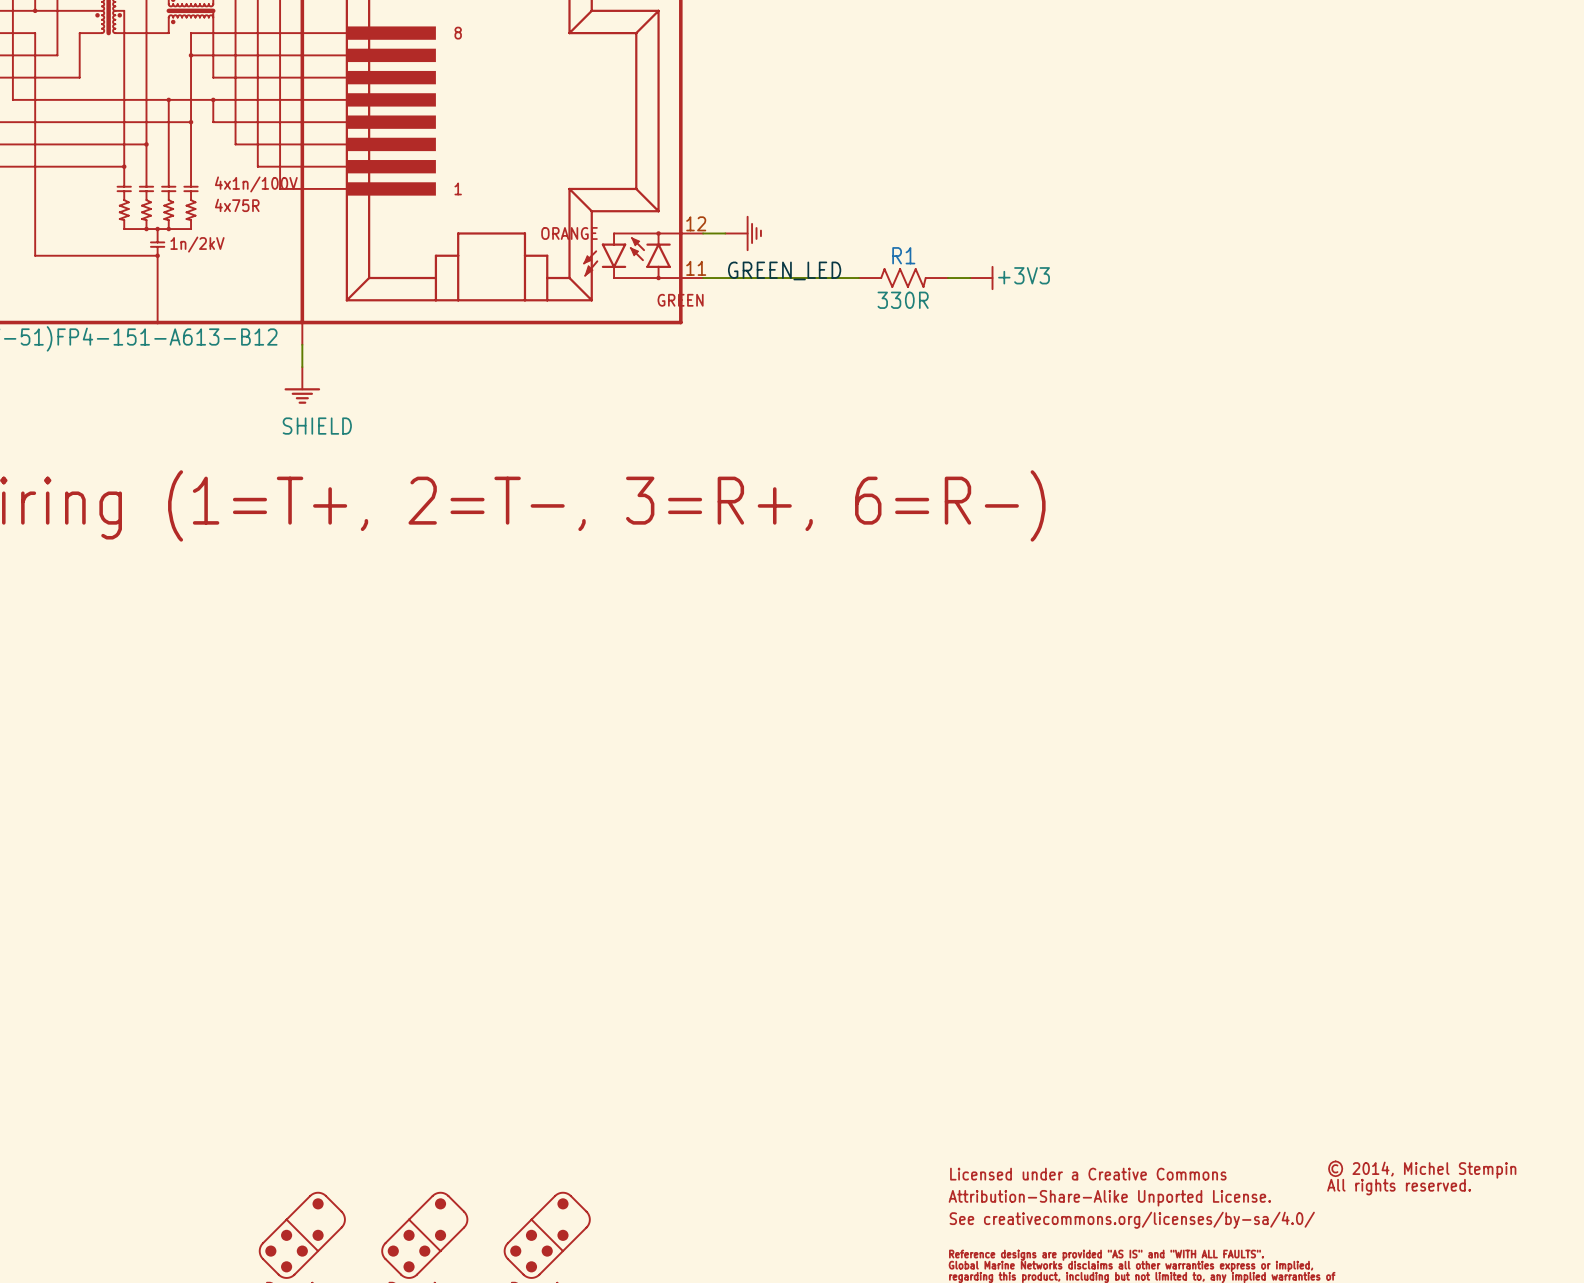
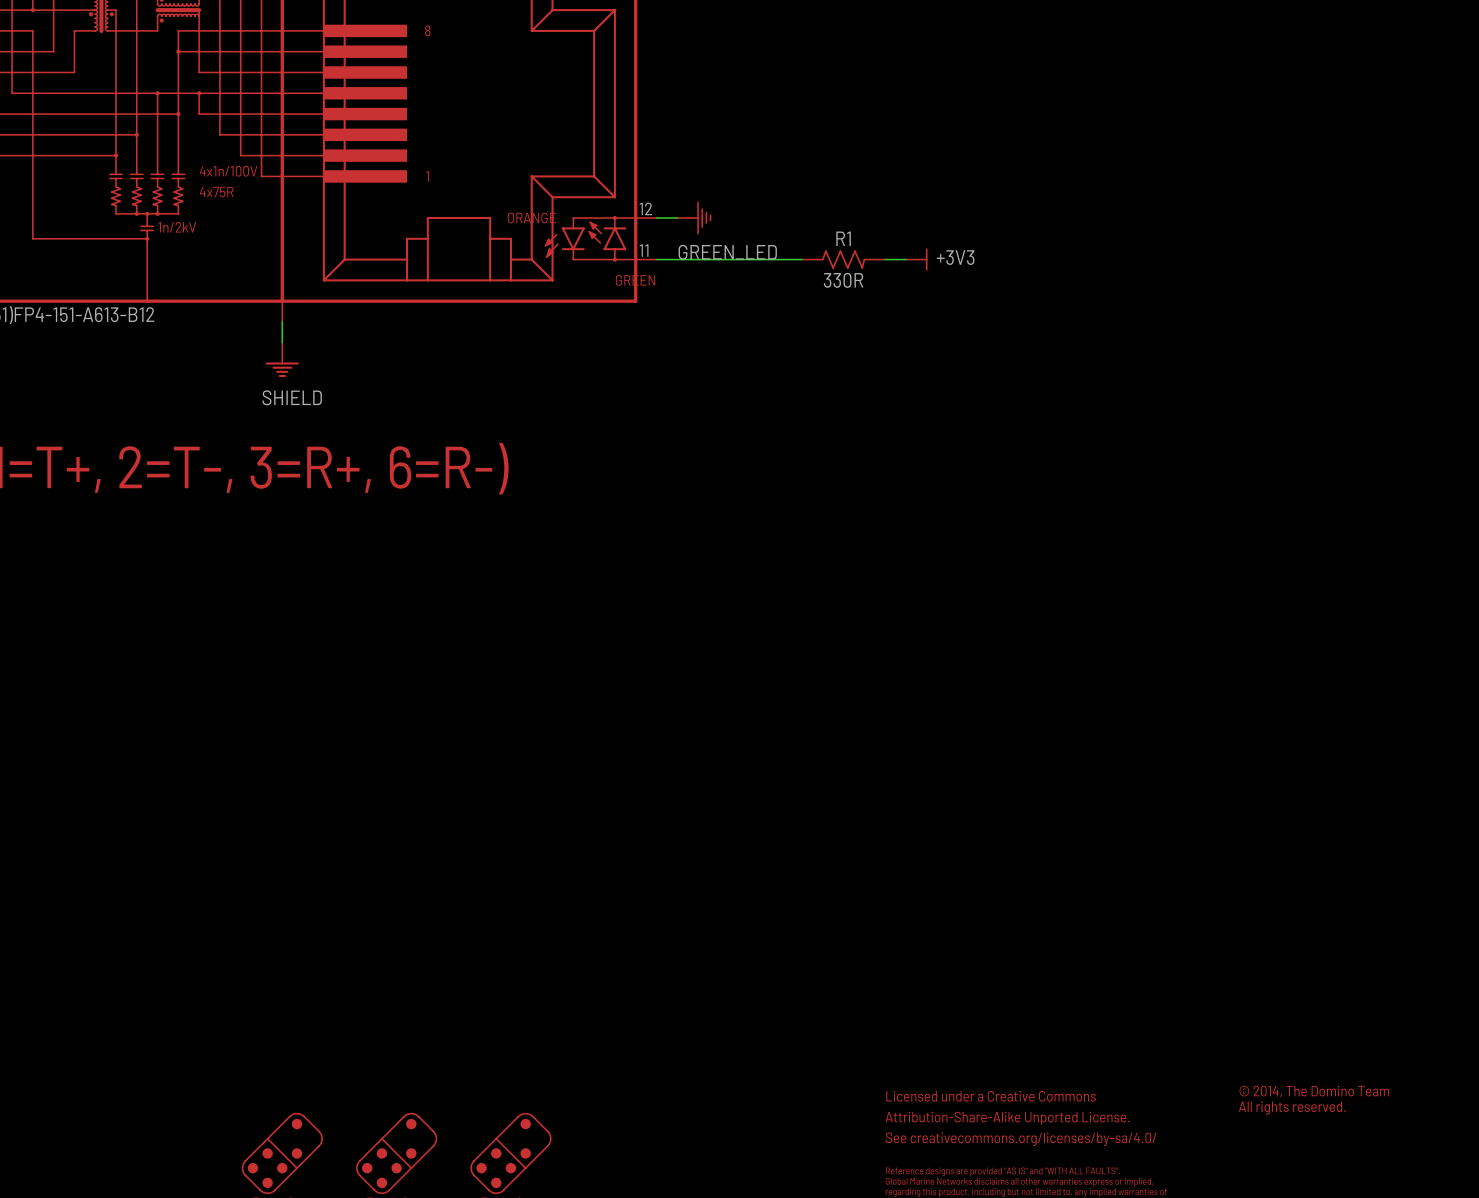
text: © 2014, Michel Stempin (1422, 1169) -> © 2014, The Domino Team (1314, 1091)

